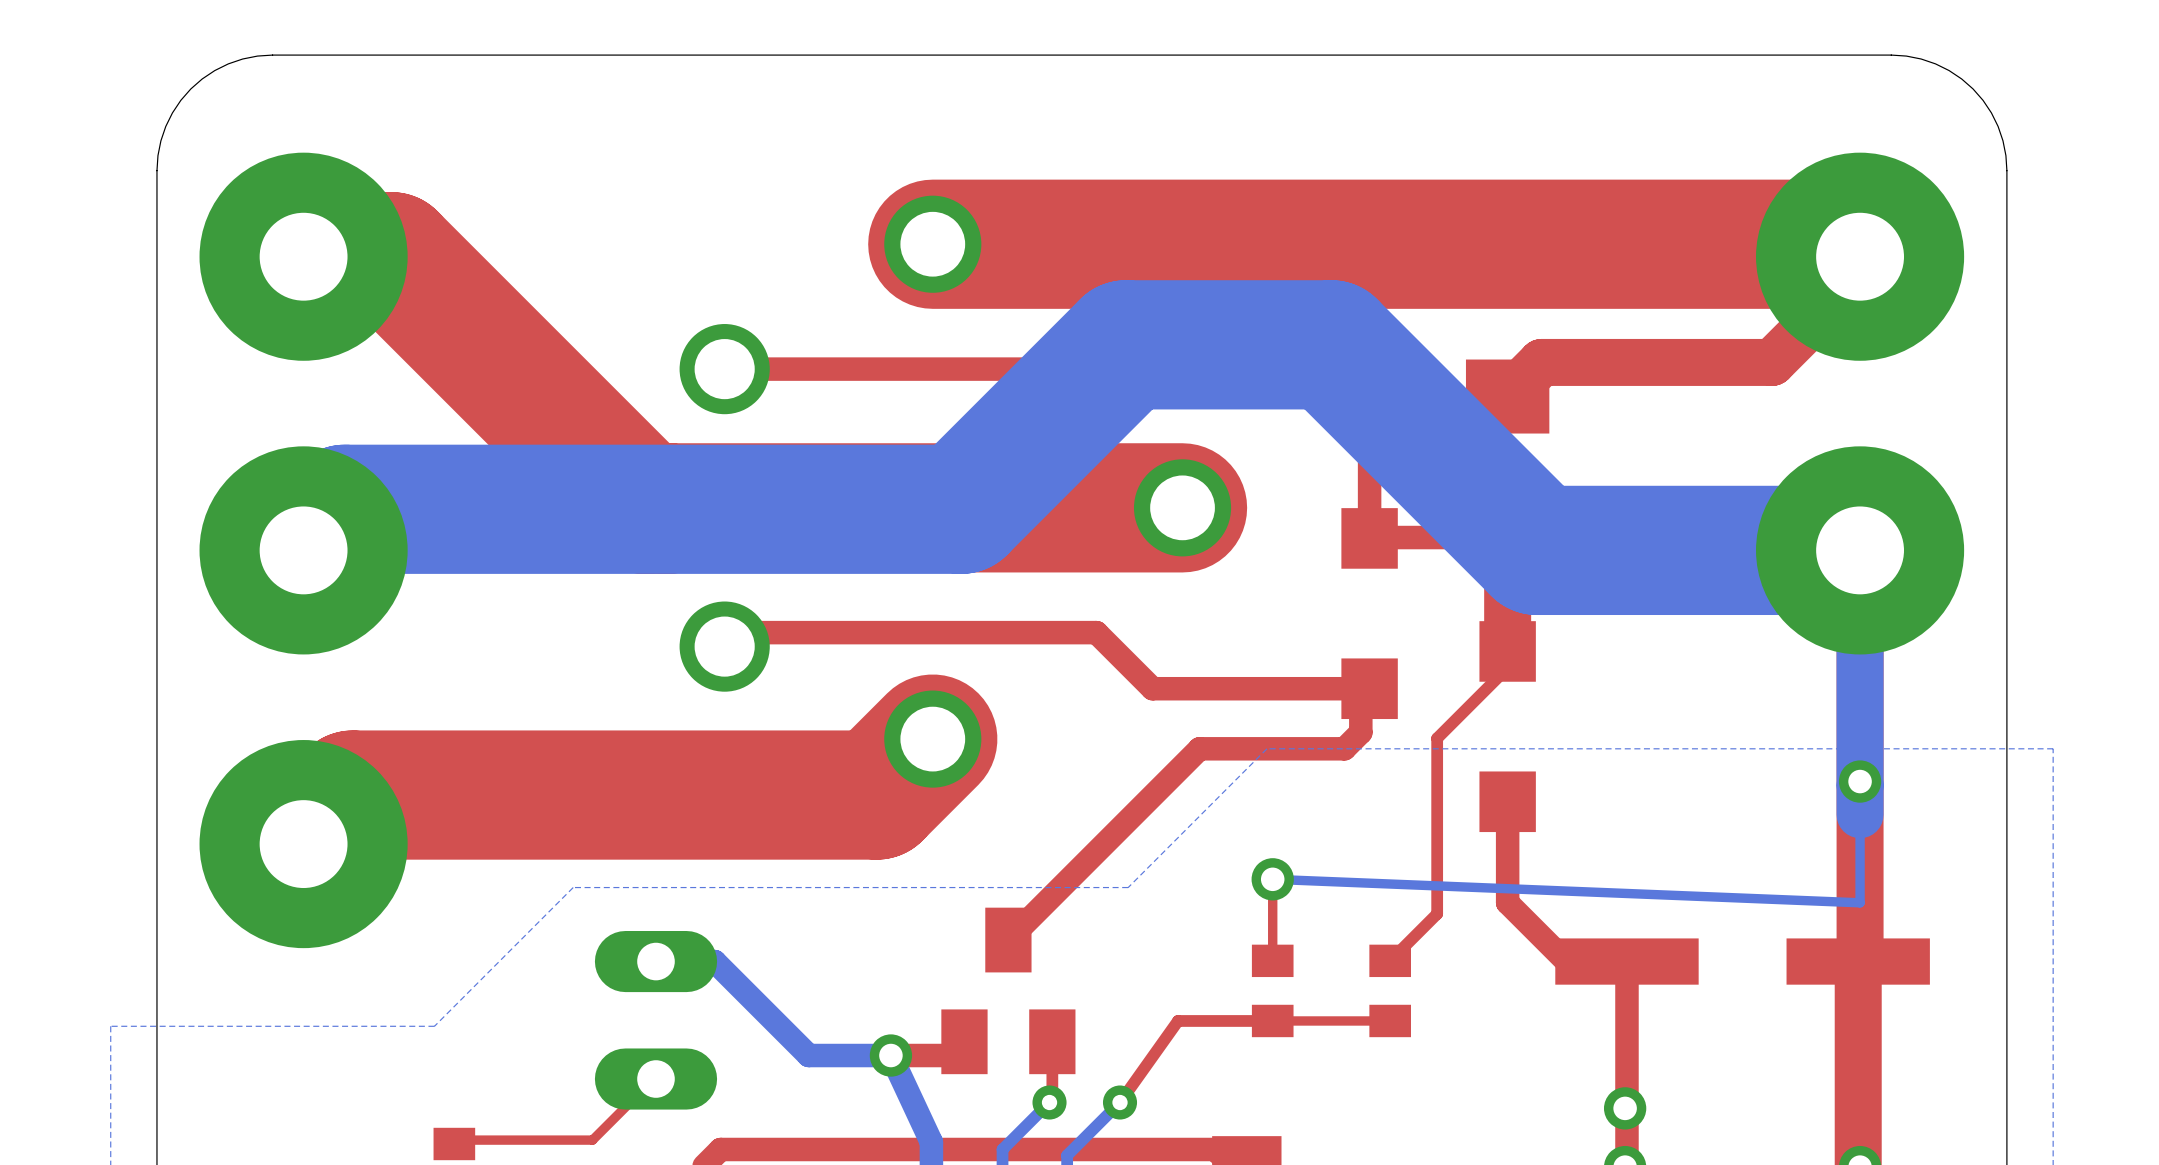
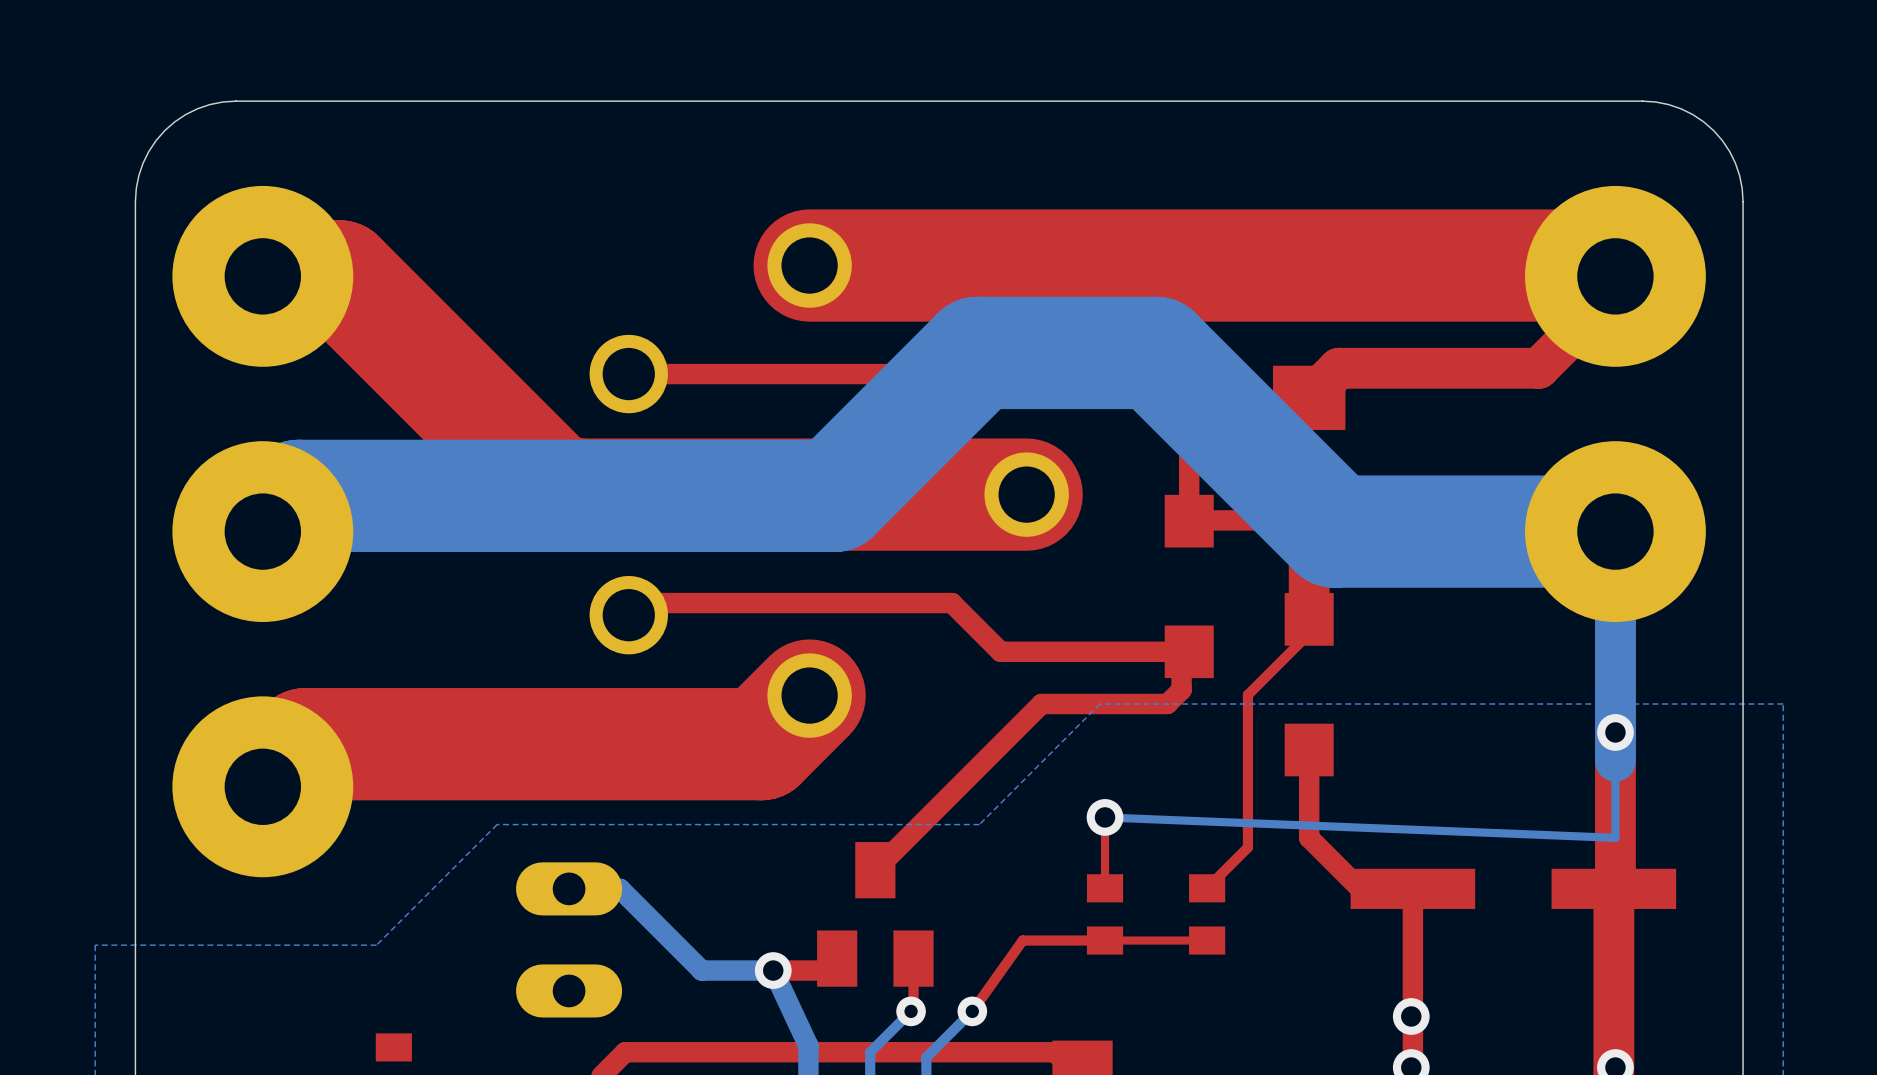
top track: (655, 1079) (653, 1079) (592, 1140) (456, 1140) (454, 1143) -> none

